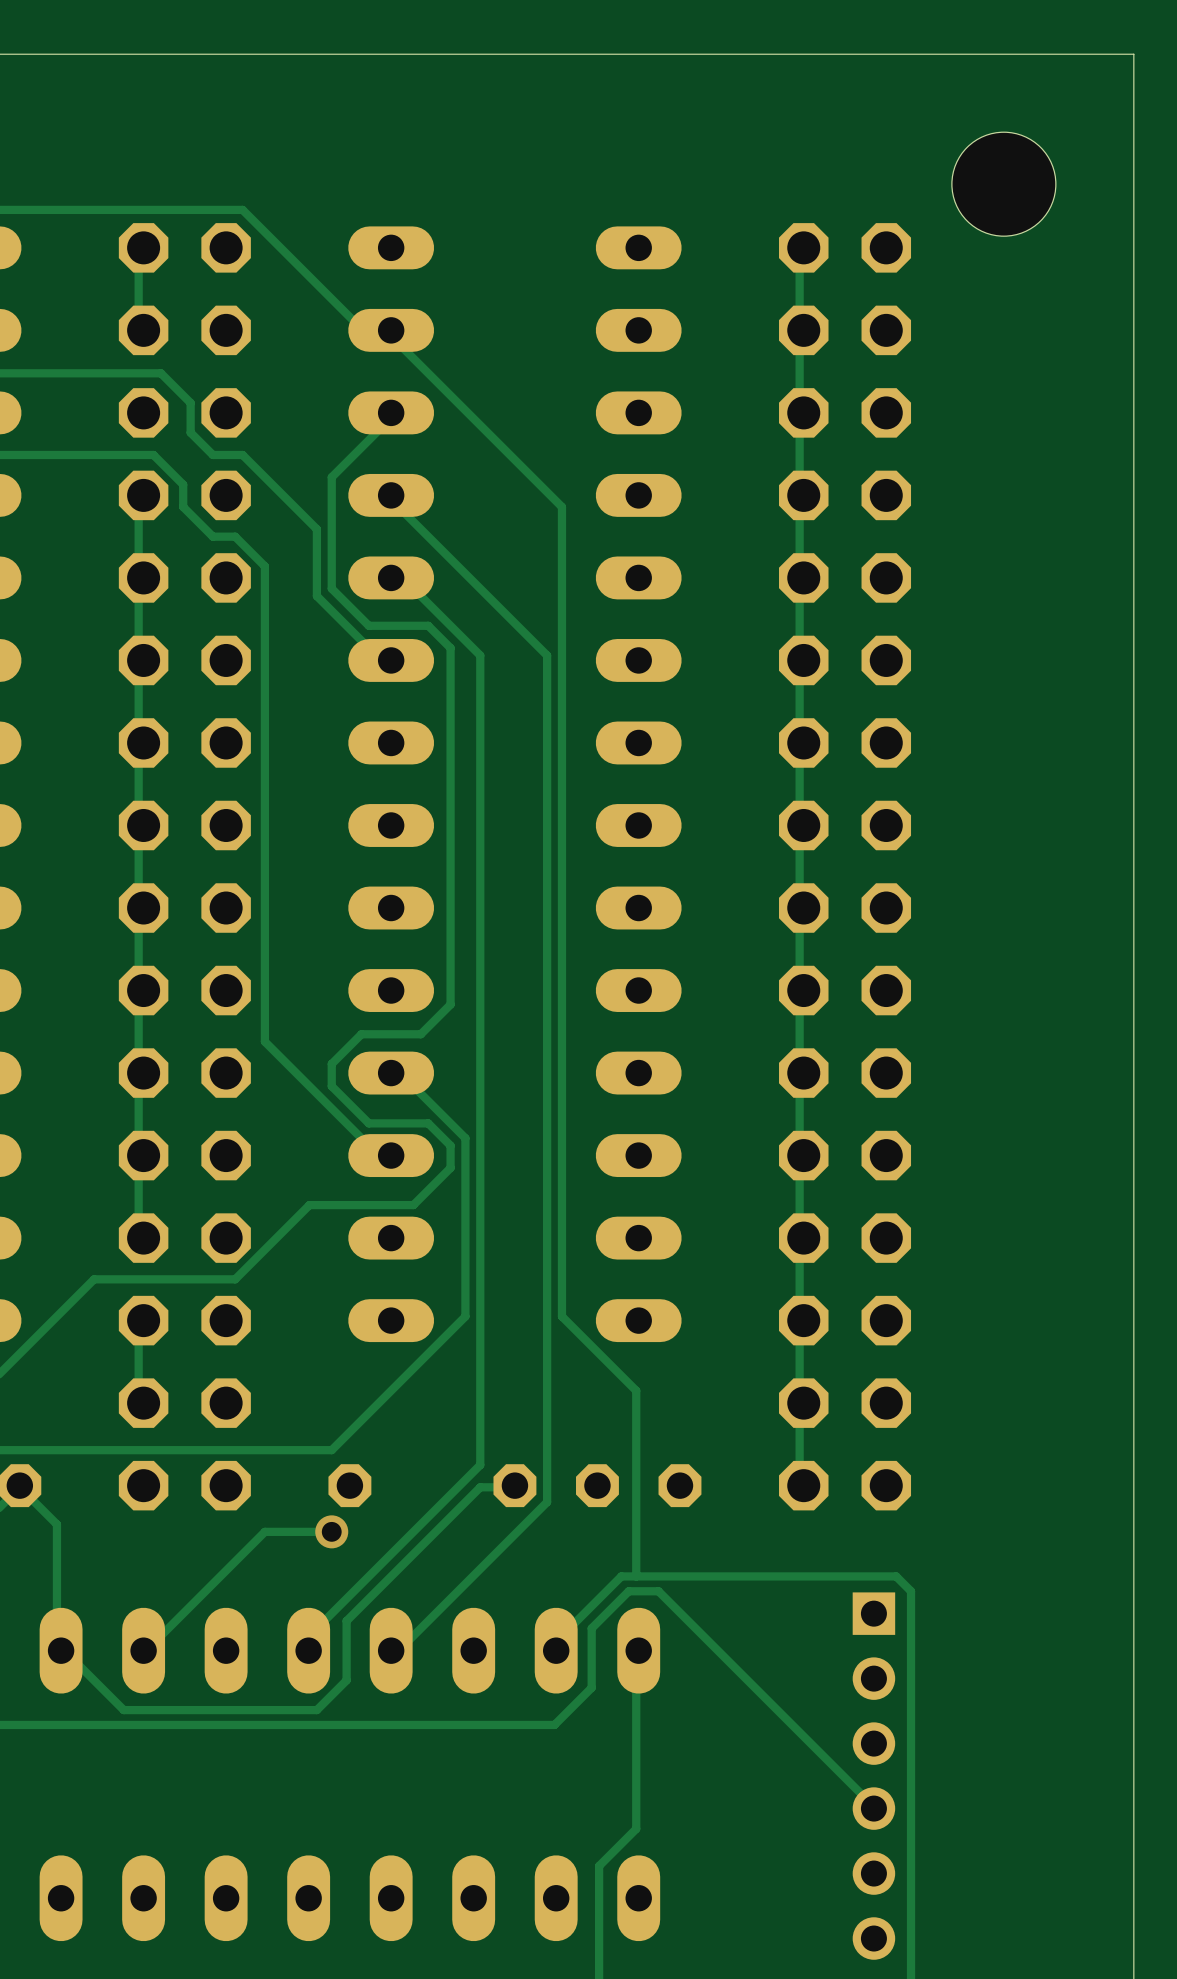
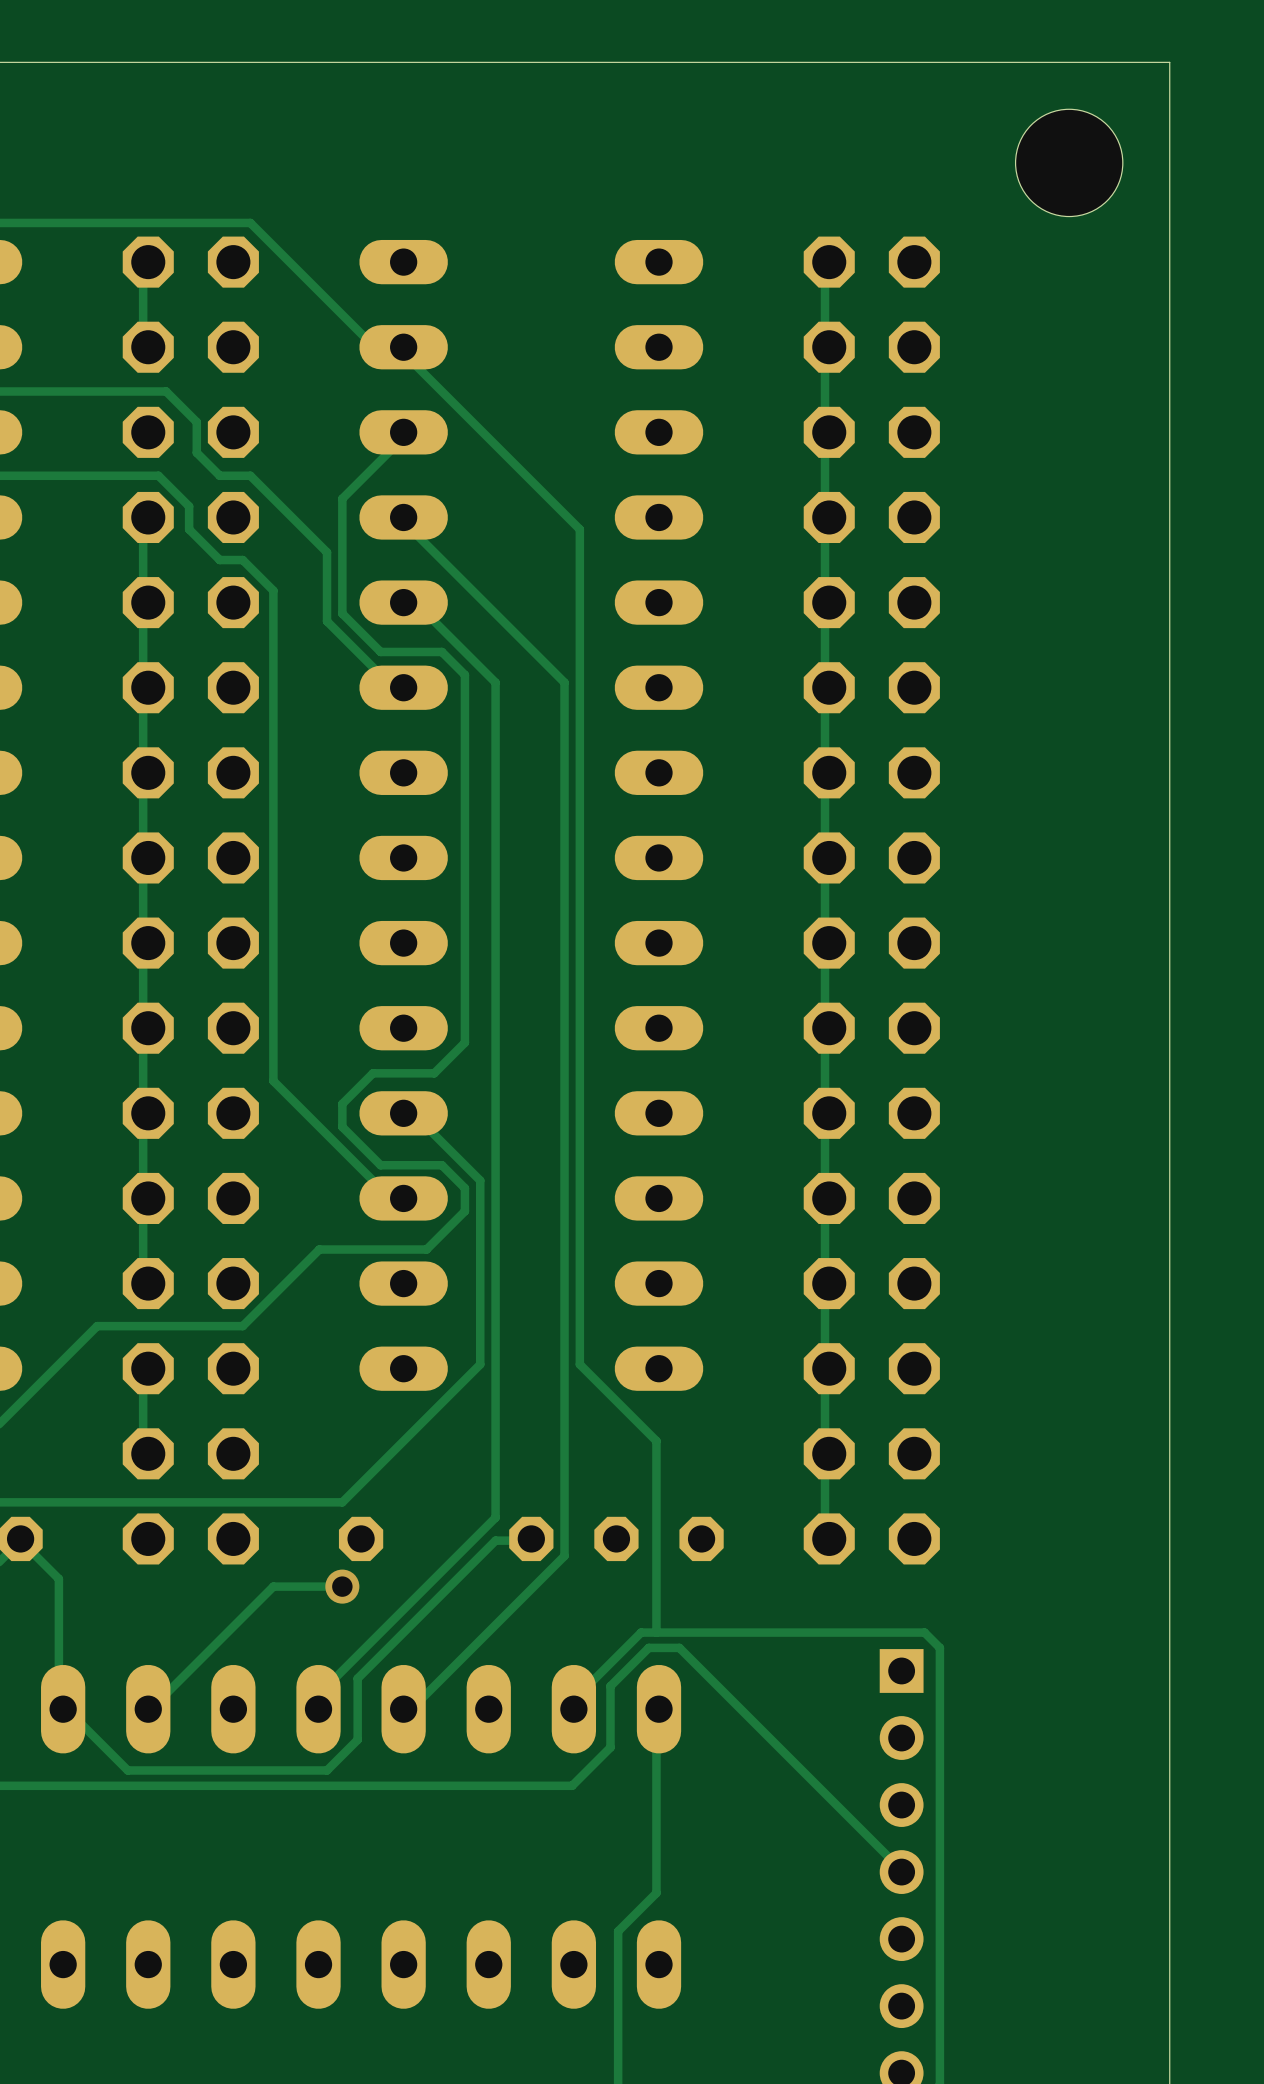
hole position: (1003, 184) -> (1069, 162)

